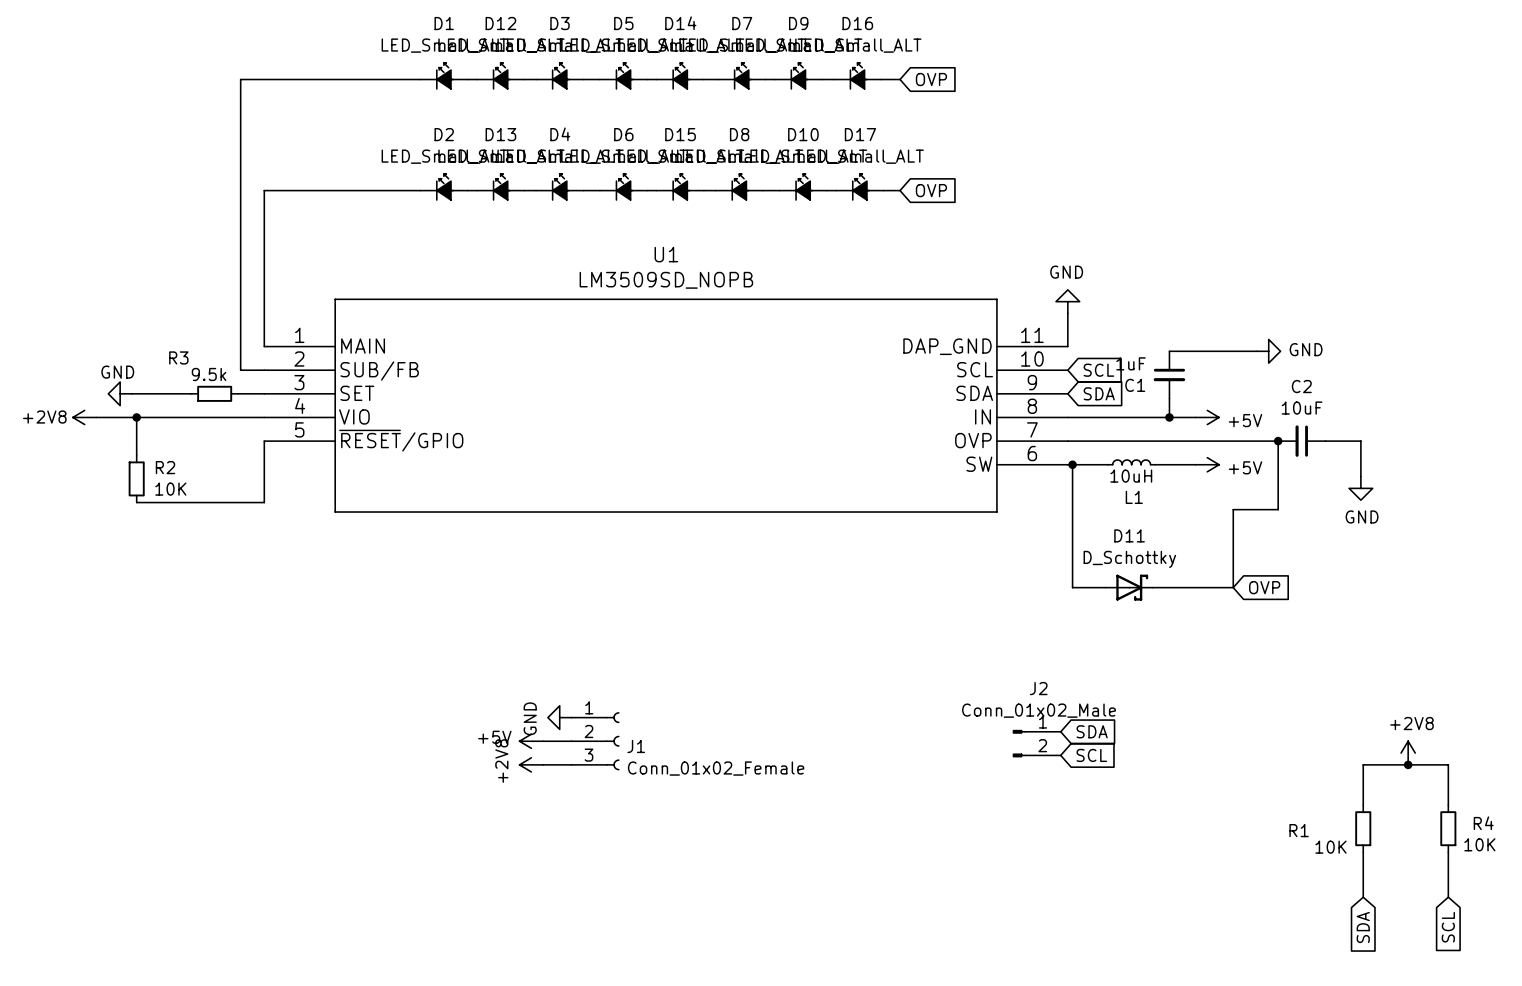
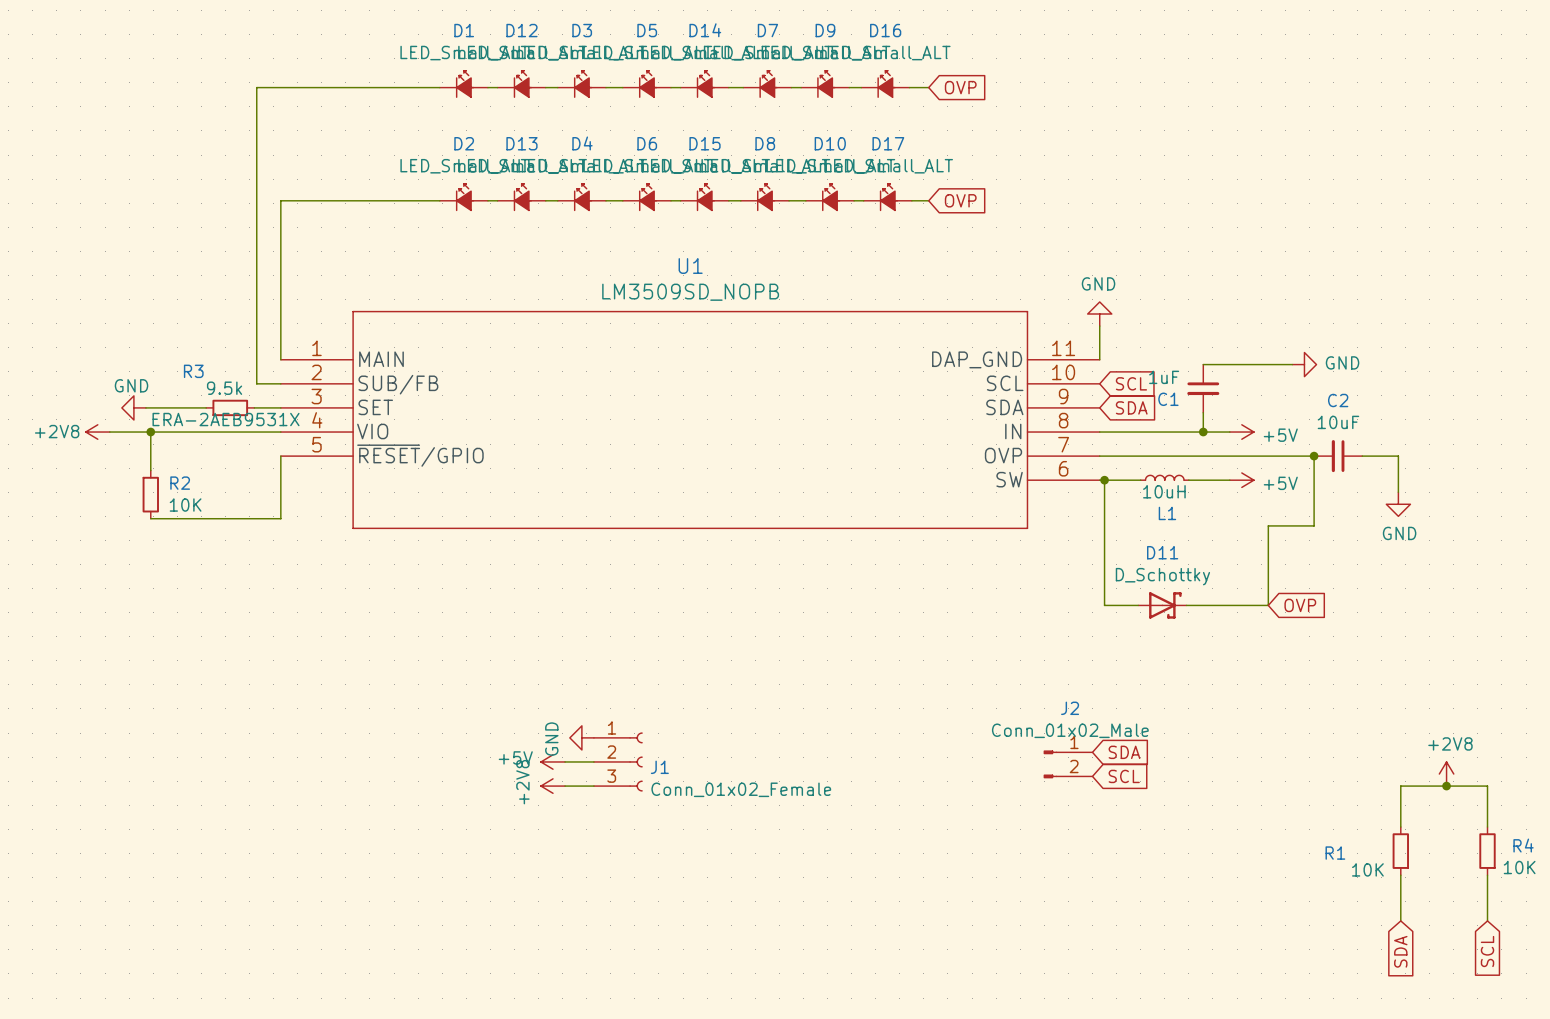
R3 text: none -> ERA-2AEB9531X (226, 419)

